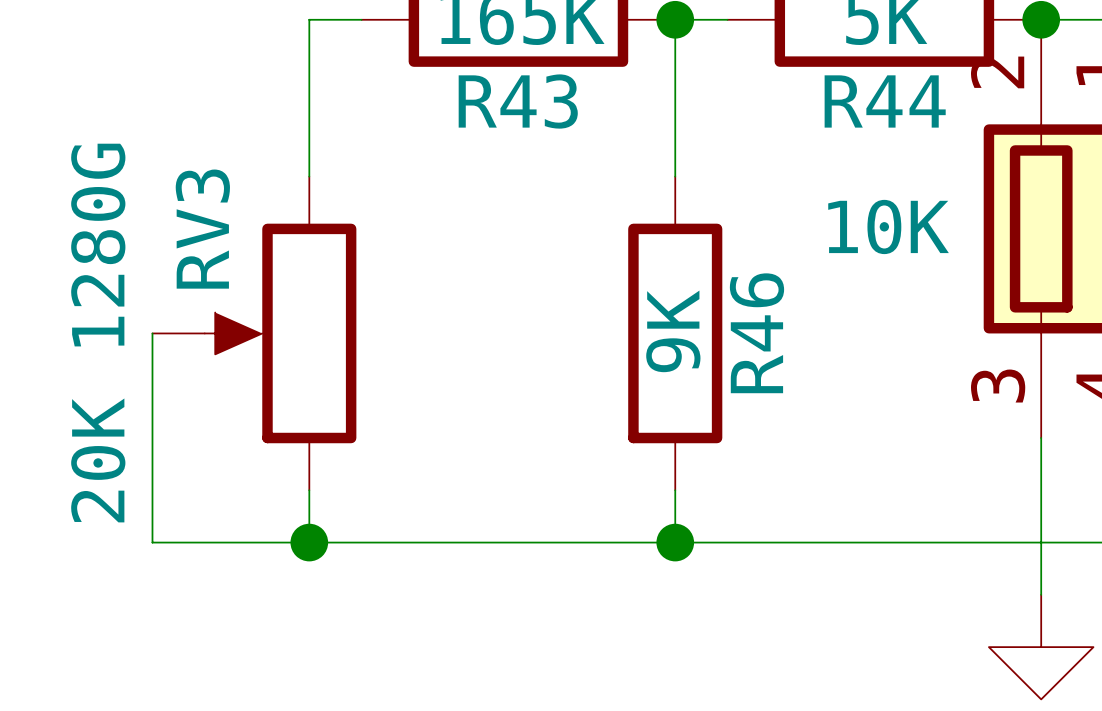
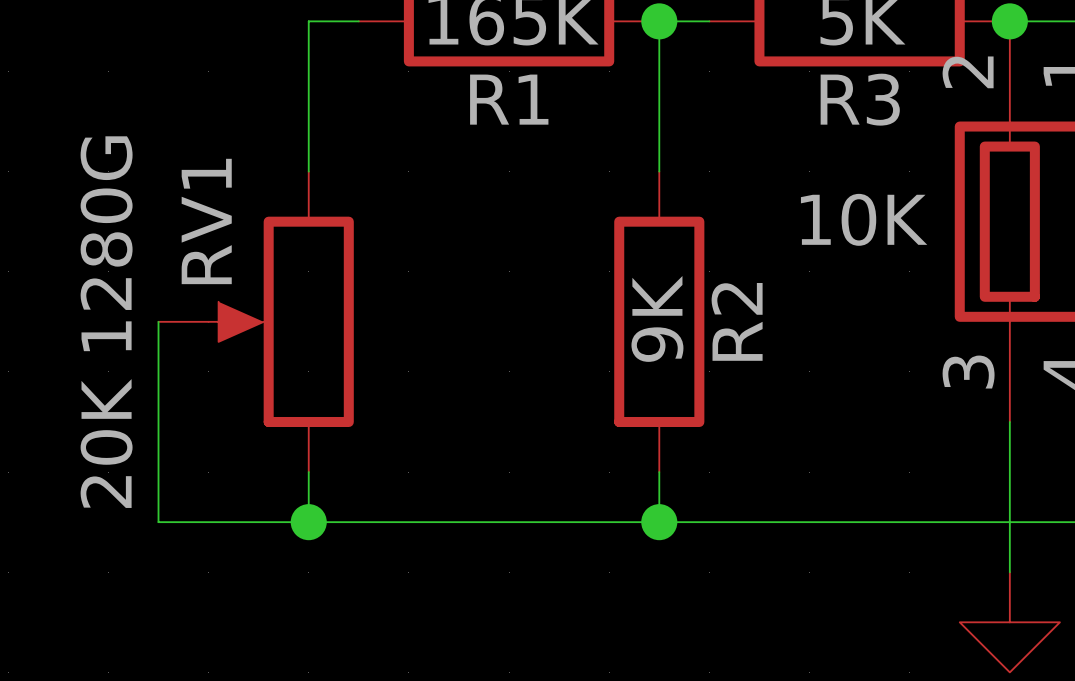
R43 name: R43 (518, 101) -> R1 (509, 99)
R44 name: R44 (885, 101) -> R3 (860, 99)
RV3 name: RV3 (202, 229) -> RV1 (206, 221)
R46 name: R46 (756, 333) -> R2 (737, 321)

